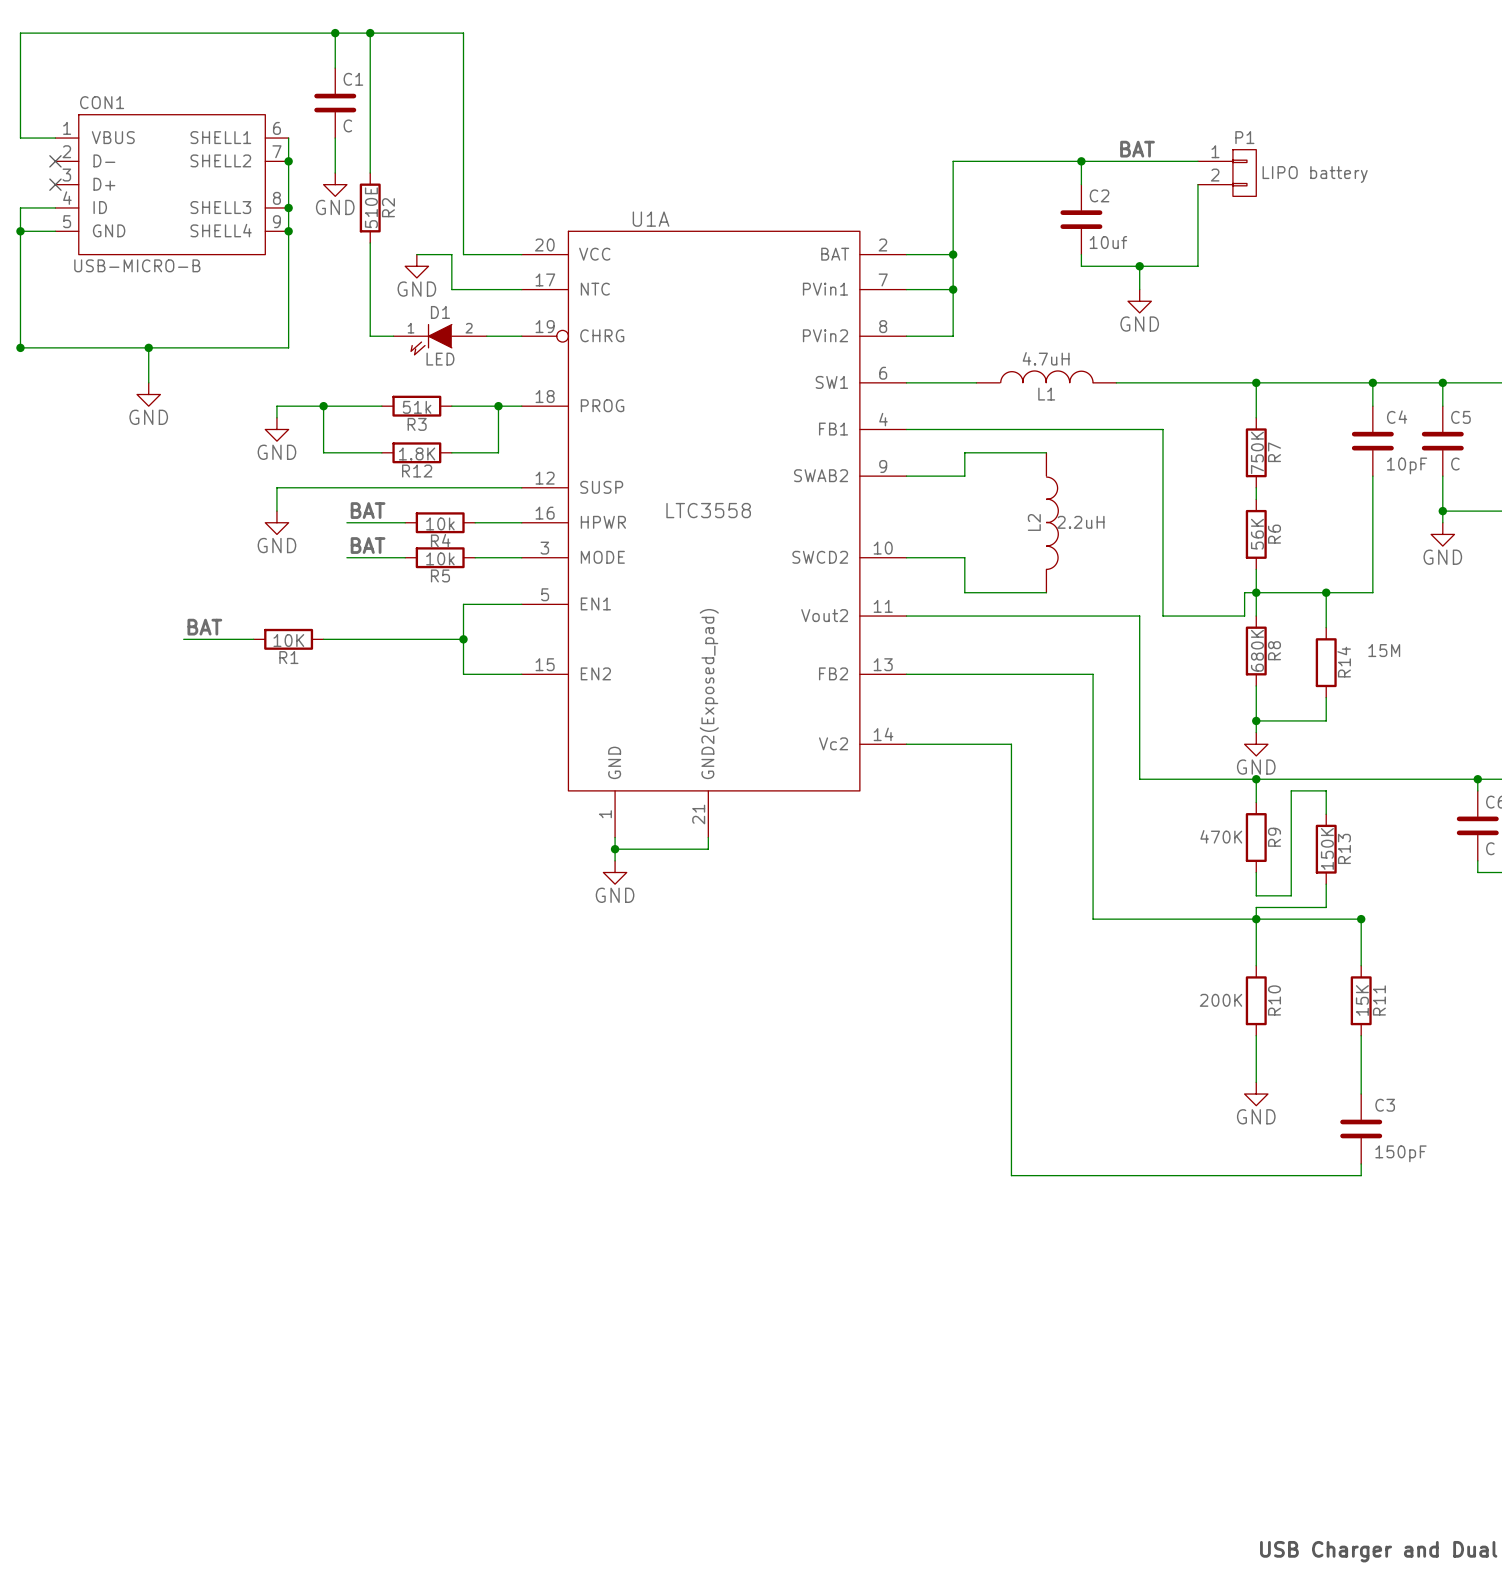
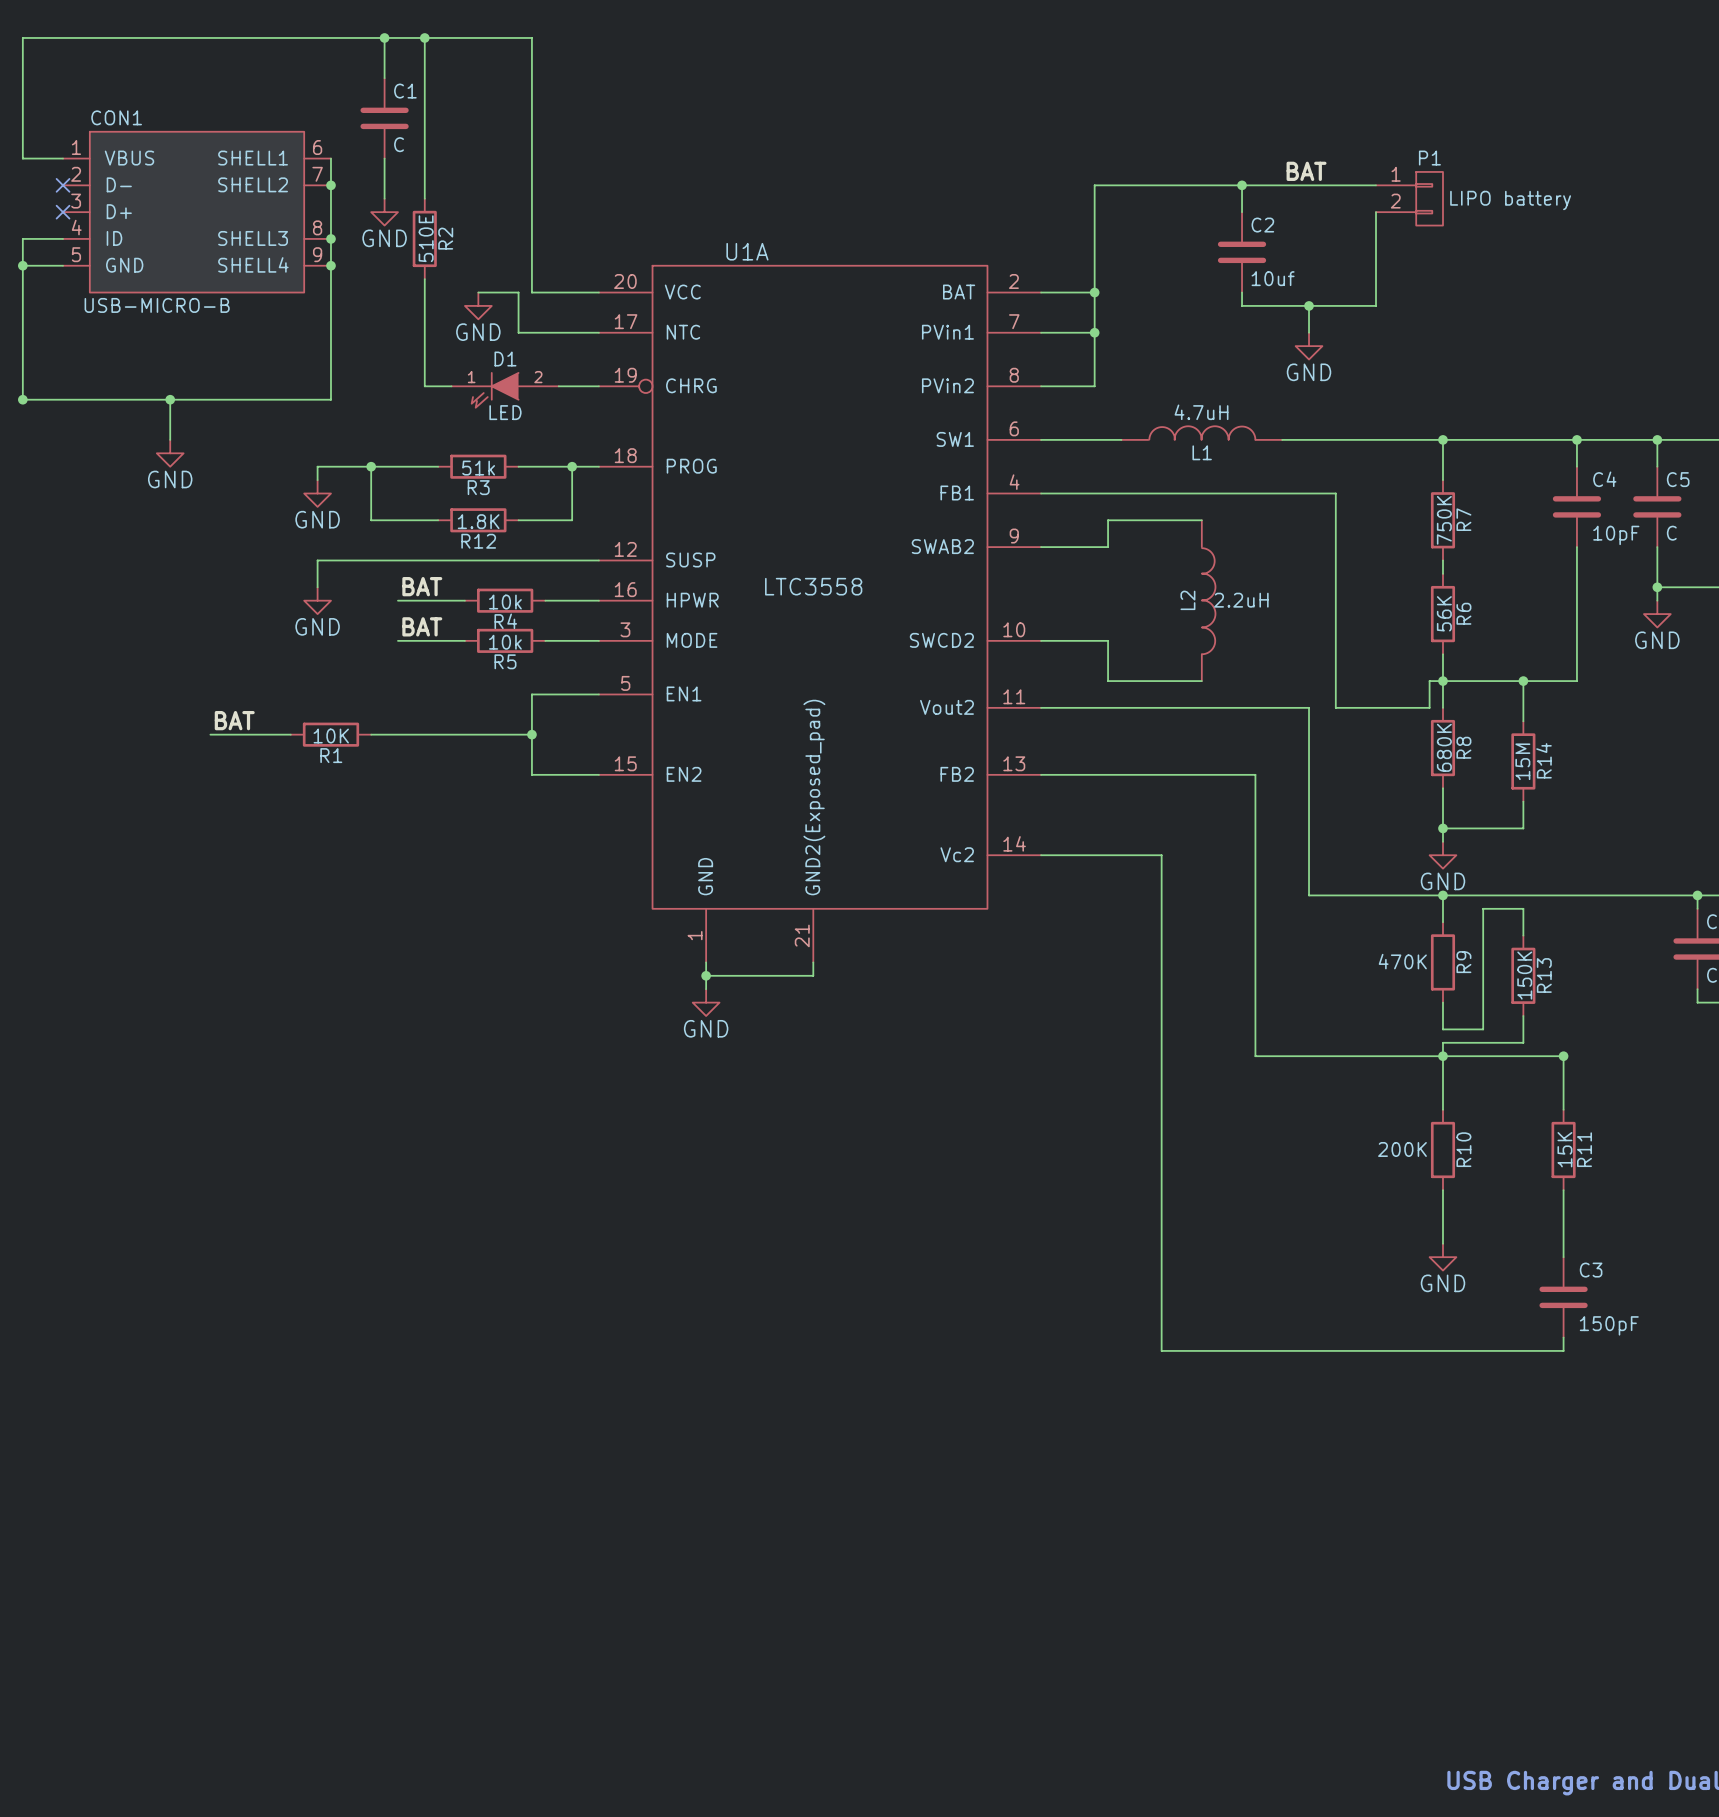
R14 value rotation: 0° (1384, 650) -> 90° counterclockwise (1522, 761)
R14 value position: 15M (1384, 650) -> 15M (1522, 761)

